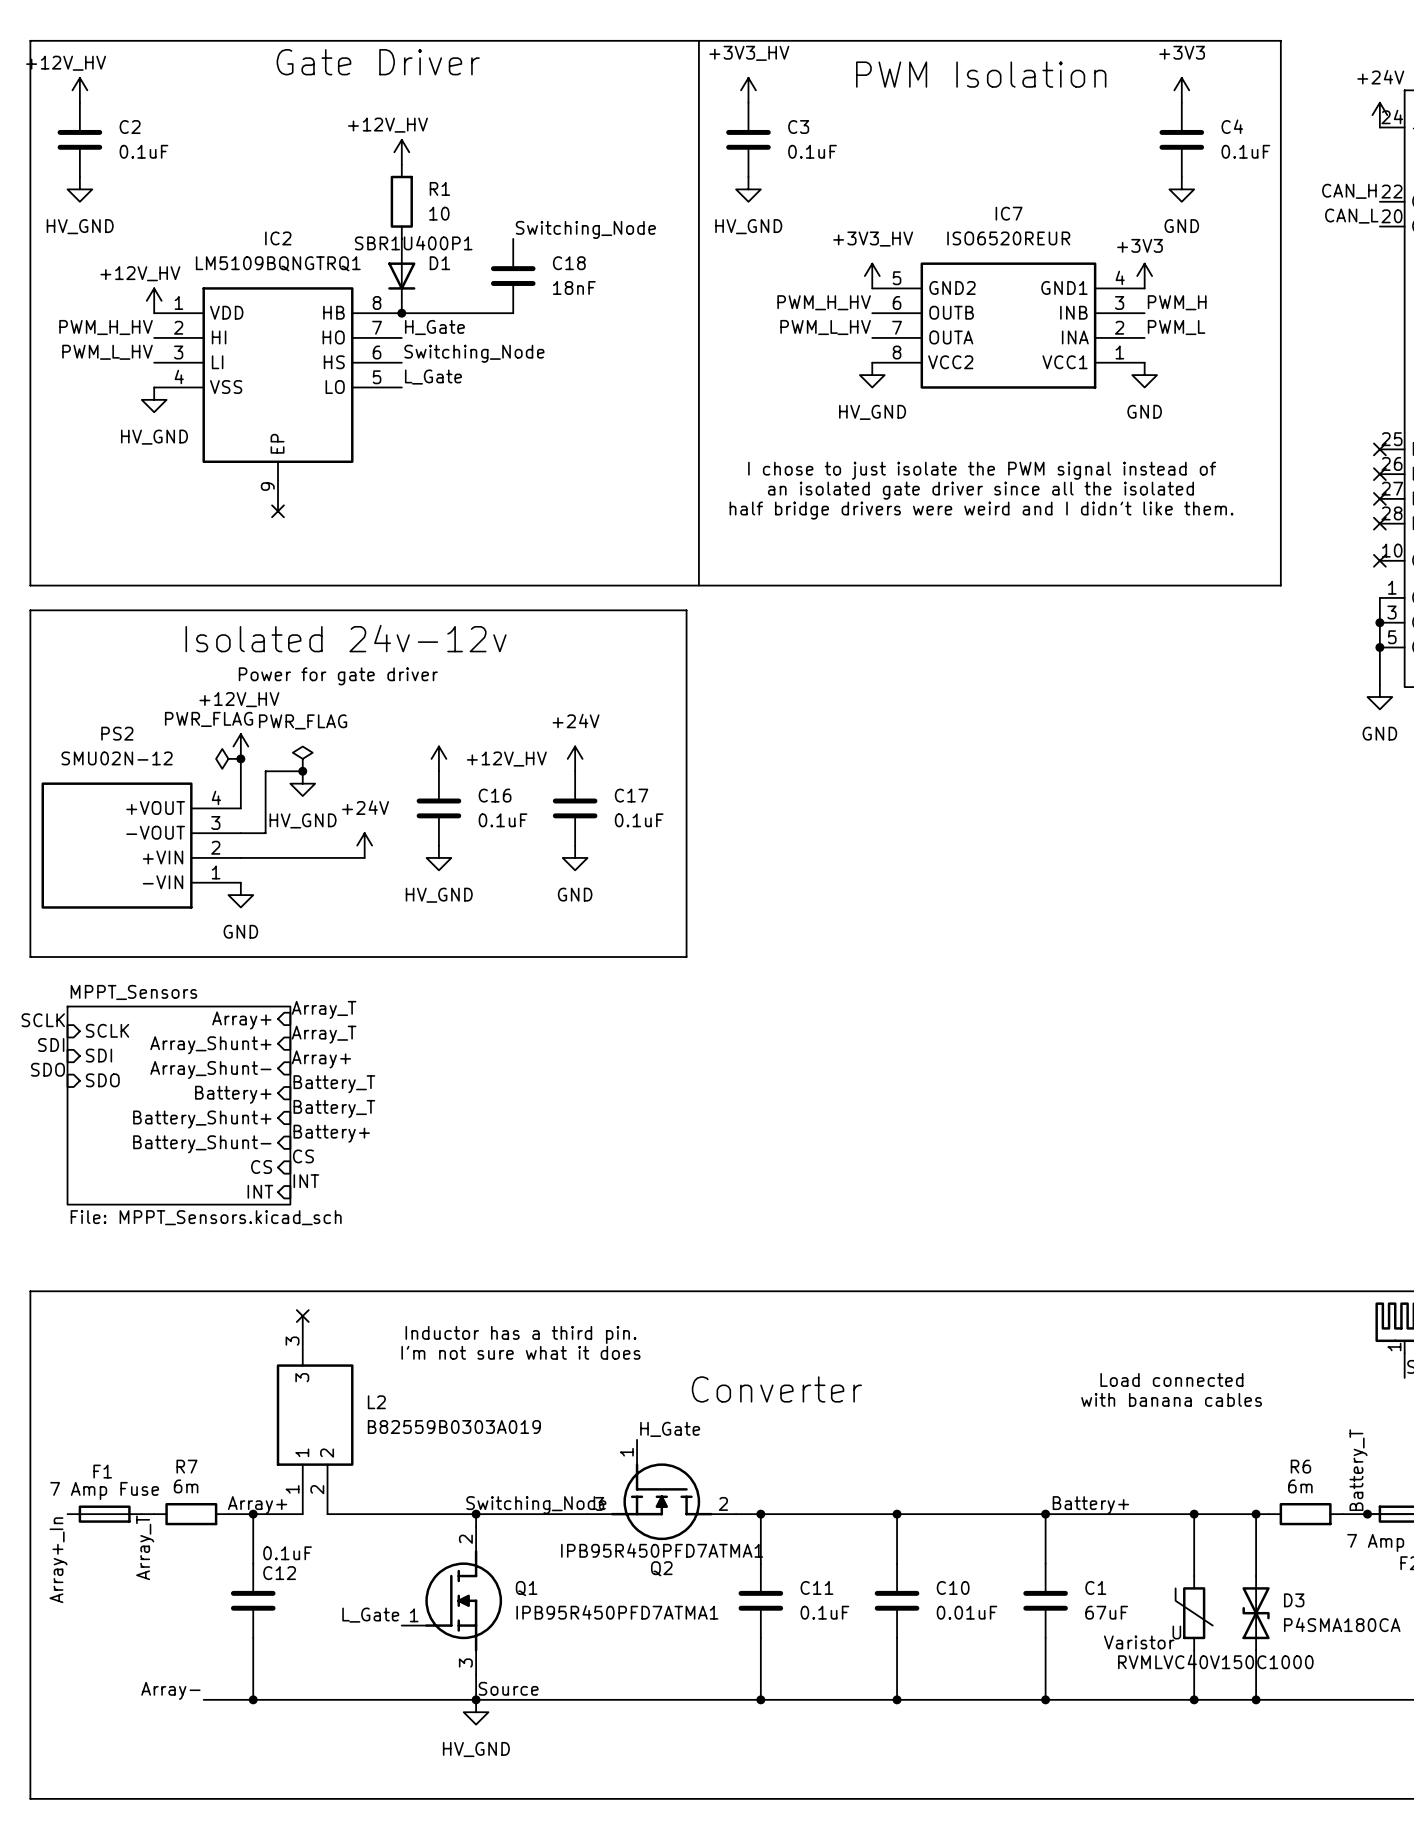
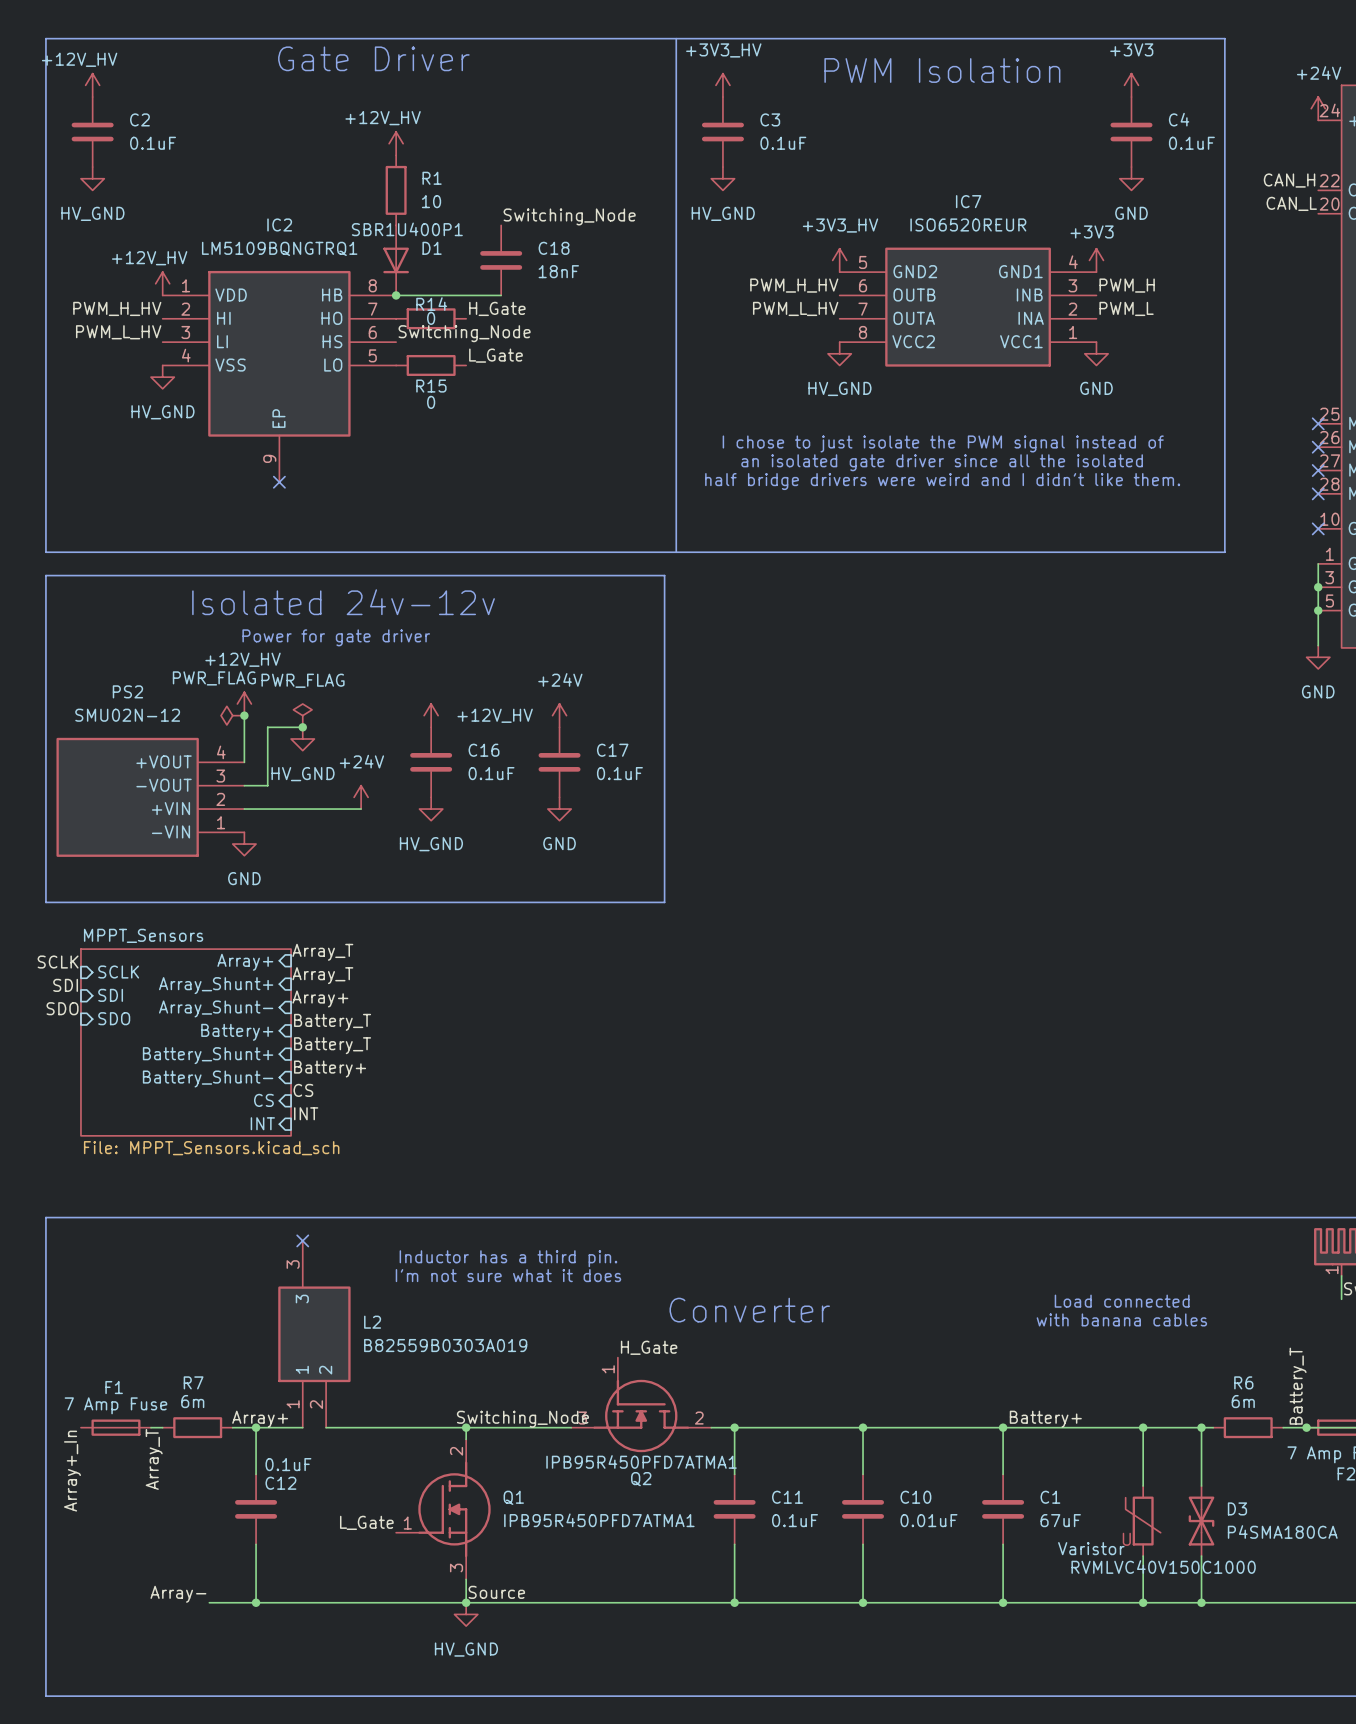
label position: H_Gate (434, 327) -> H_Gate (497, 308)
R14: none -> 0 (431, 318)
label position: L_Gate (433, 377) -> L_Gate (495, 355)
R15: none -> 0 (431, 365)

